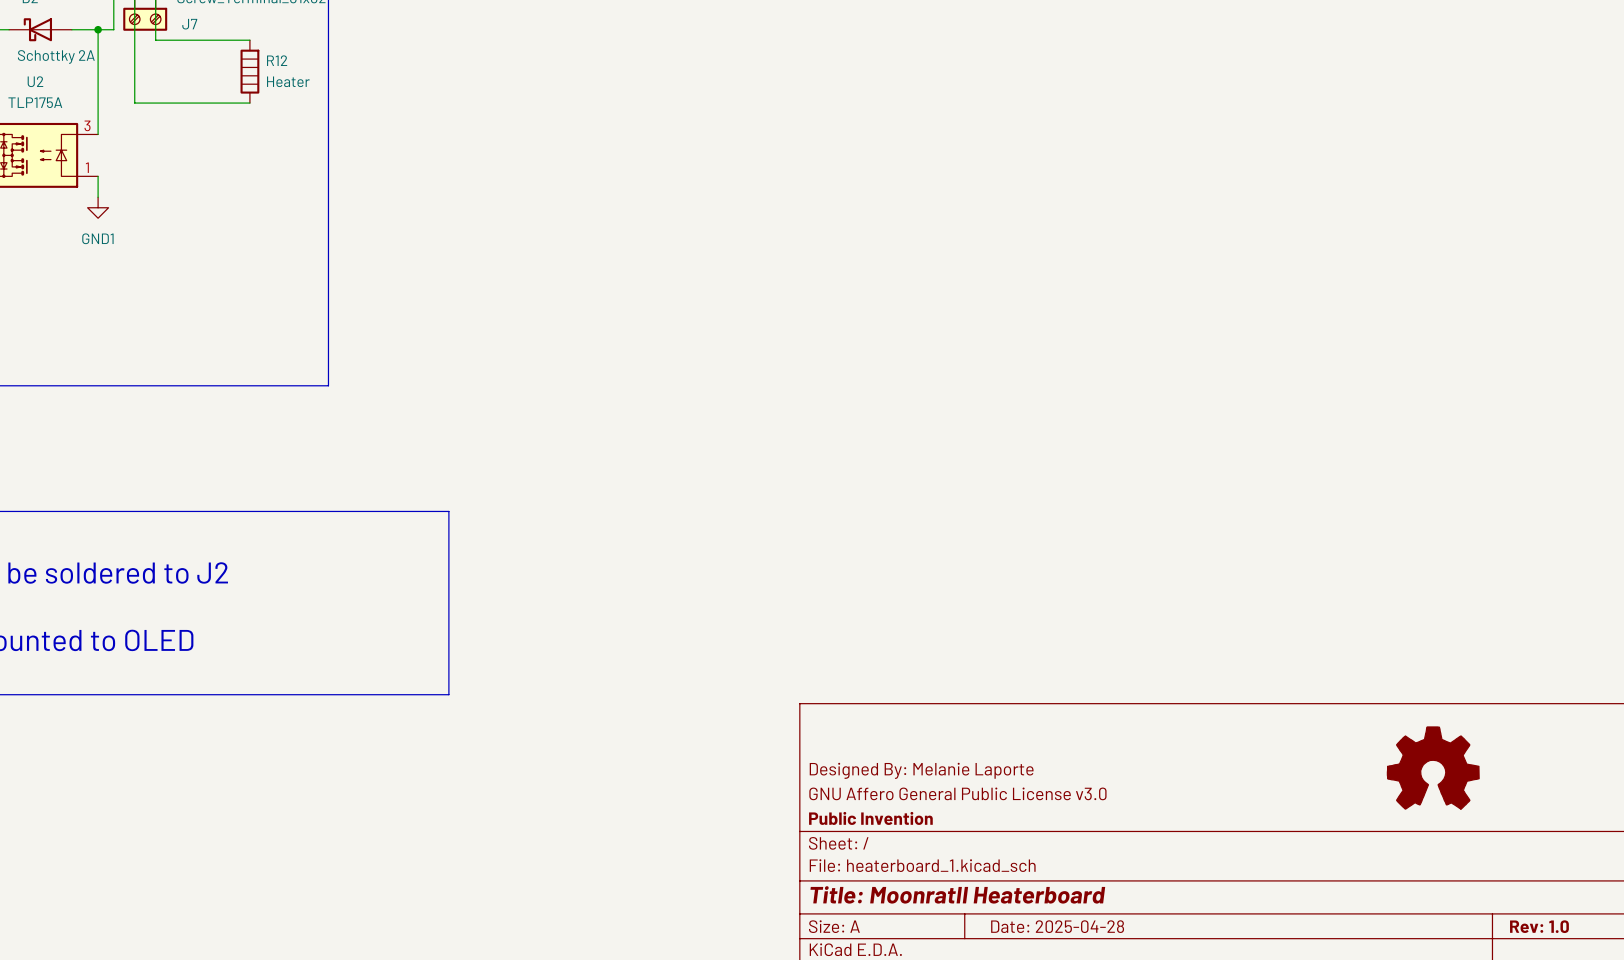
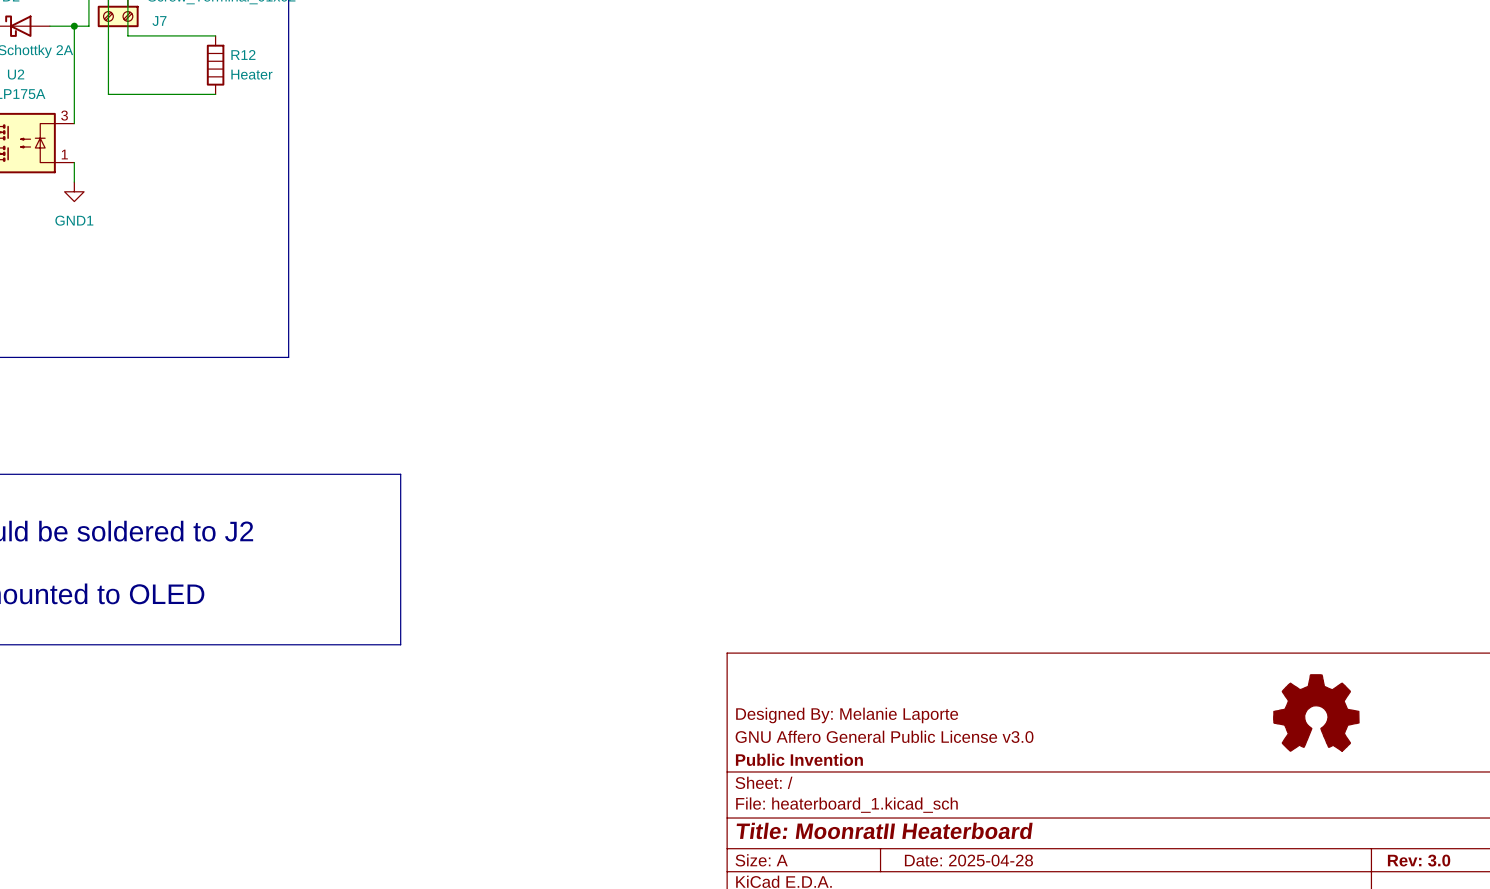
title block: Rev: 1.0 (1539, 926) -> Rev: 3.0 (1419, 860)

